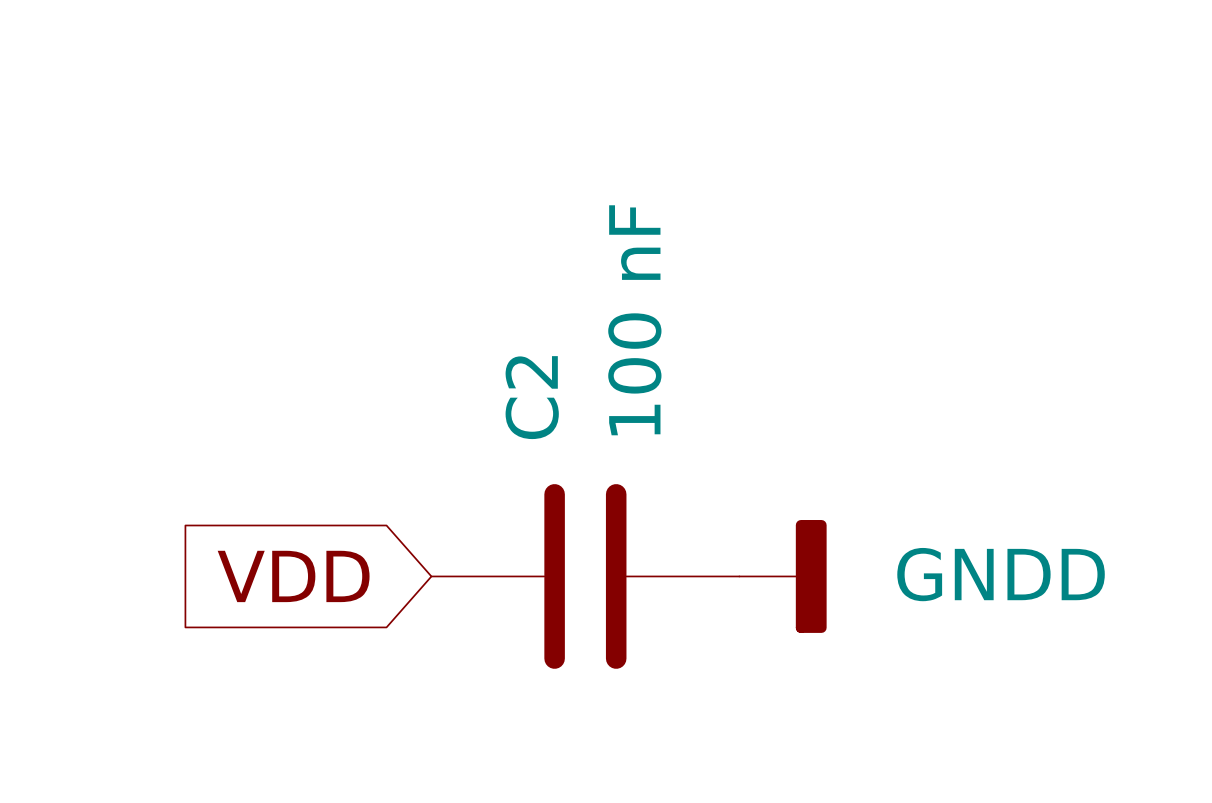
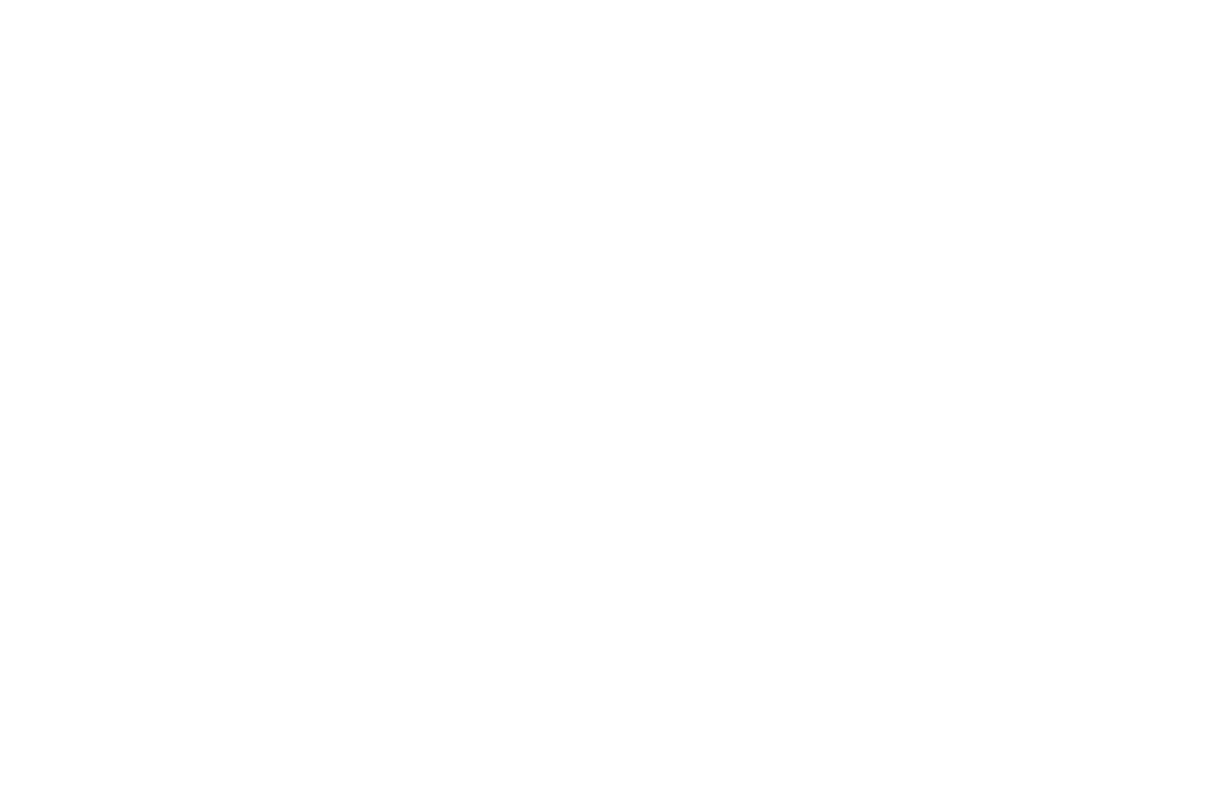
global label: VDD (293, 576) -> none
C2: 100 nF (585, 576) -> none
power symbol: GNDD (783, 576) -> none

